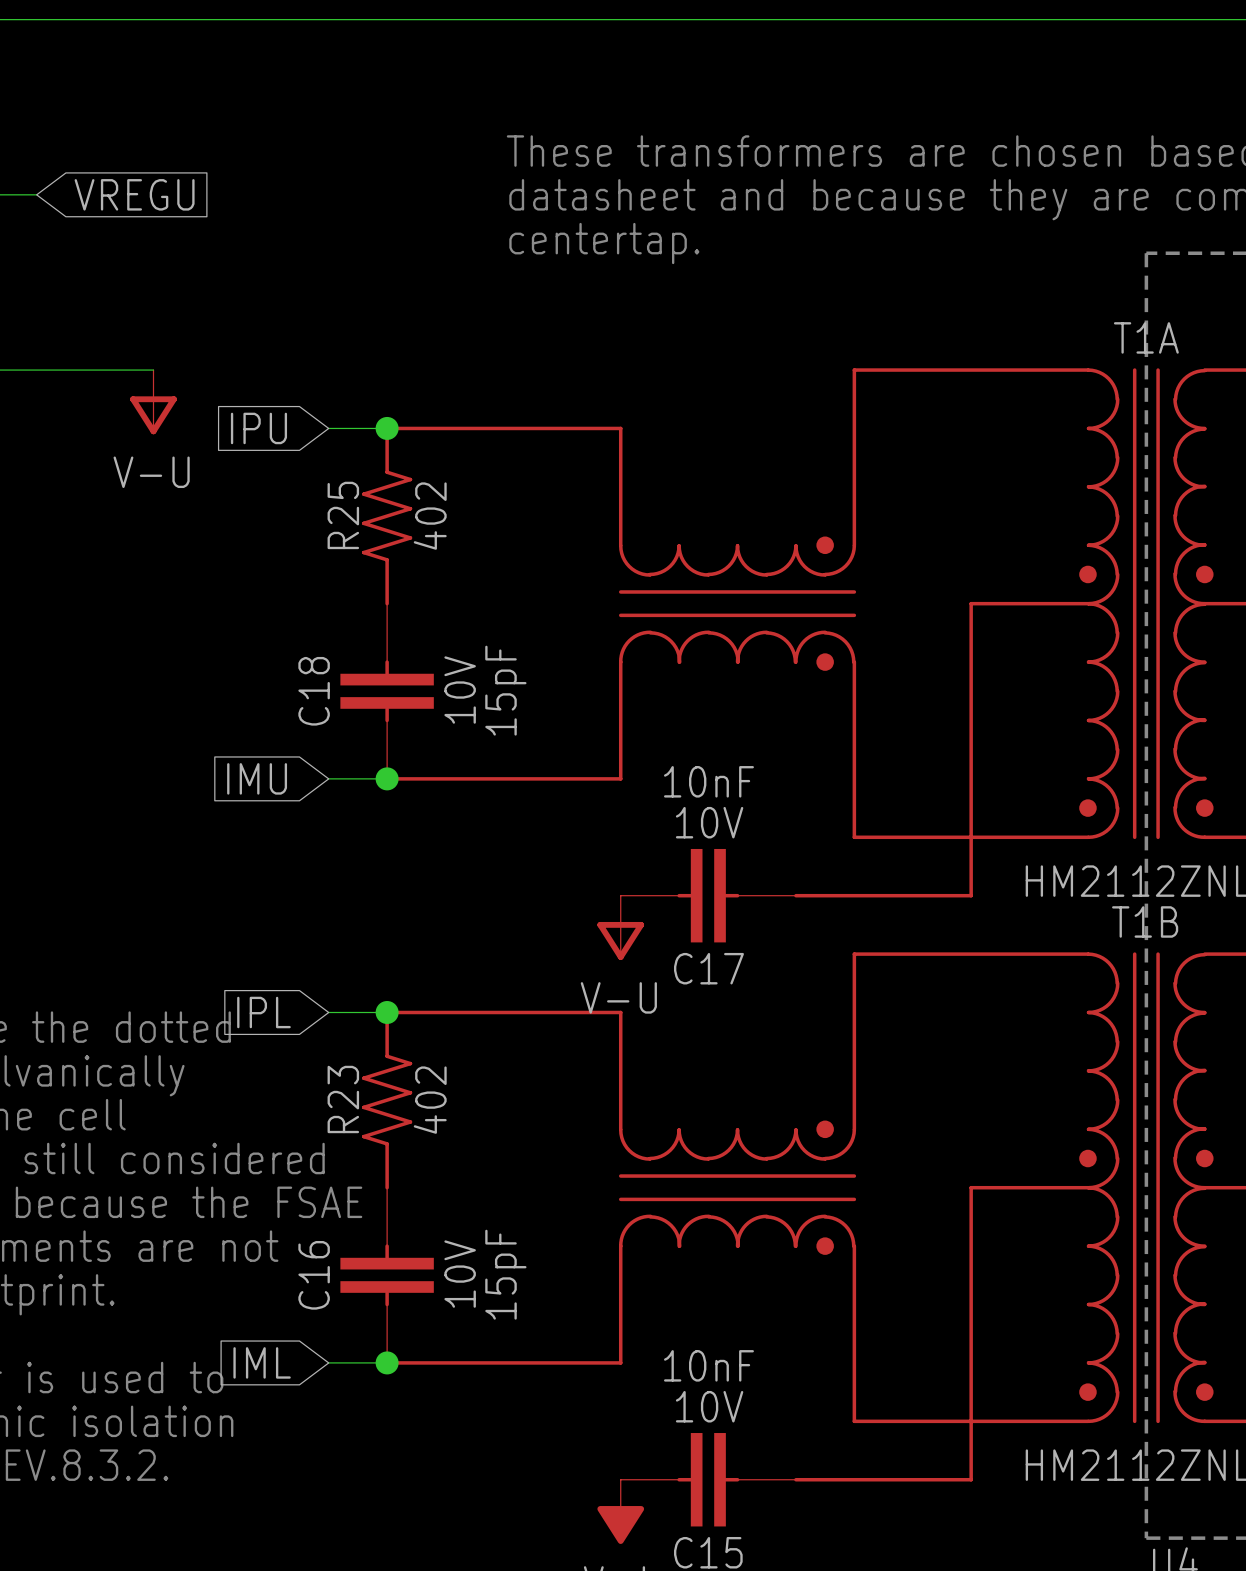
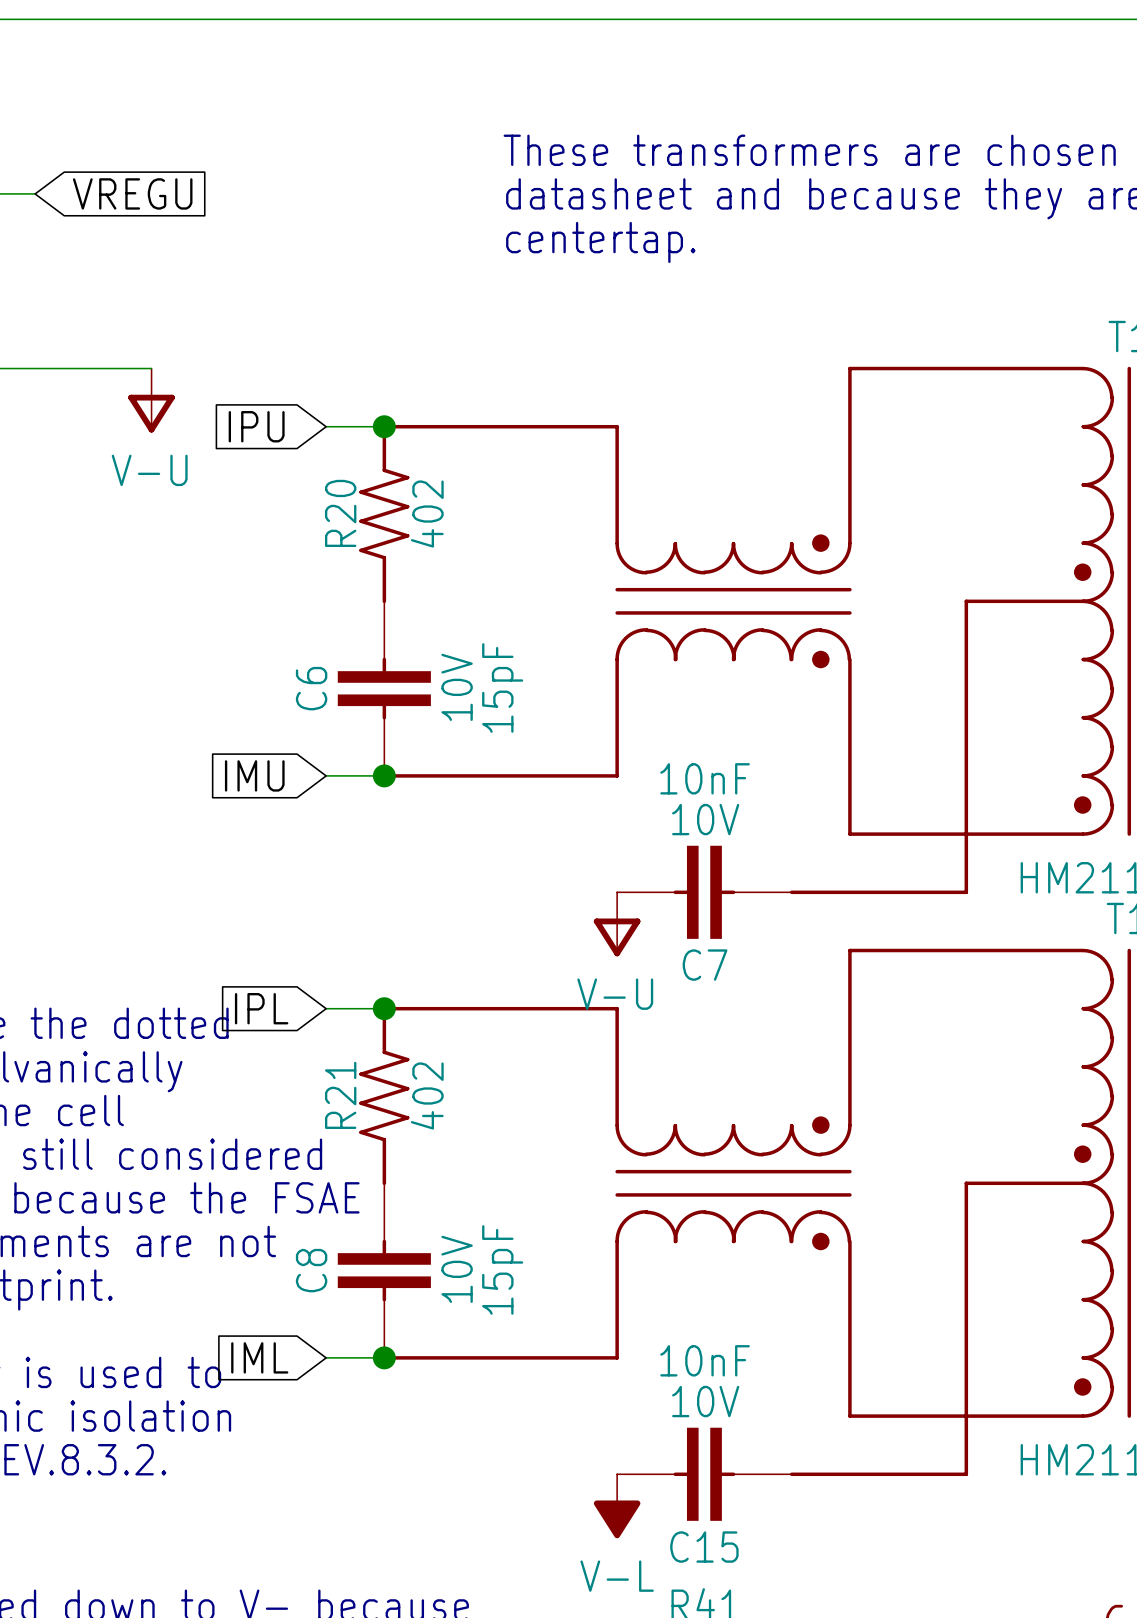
R25 name: R25 (343, 515) -> R20 (340, 513)
C18 name: C18 (314, 691) -> C6 (311, 688)
C17 name: C17 (708, 968) -> C7 (705, 965)
R23 name: R23 (343, 1099) -> R21 (340, 1095)
C16 name: C16 (314, 1275) -> C8 (311, 1270)

